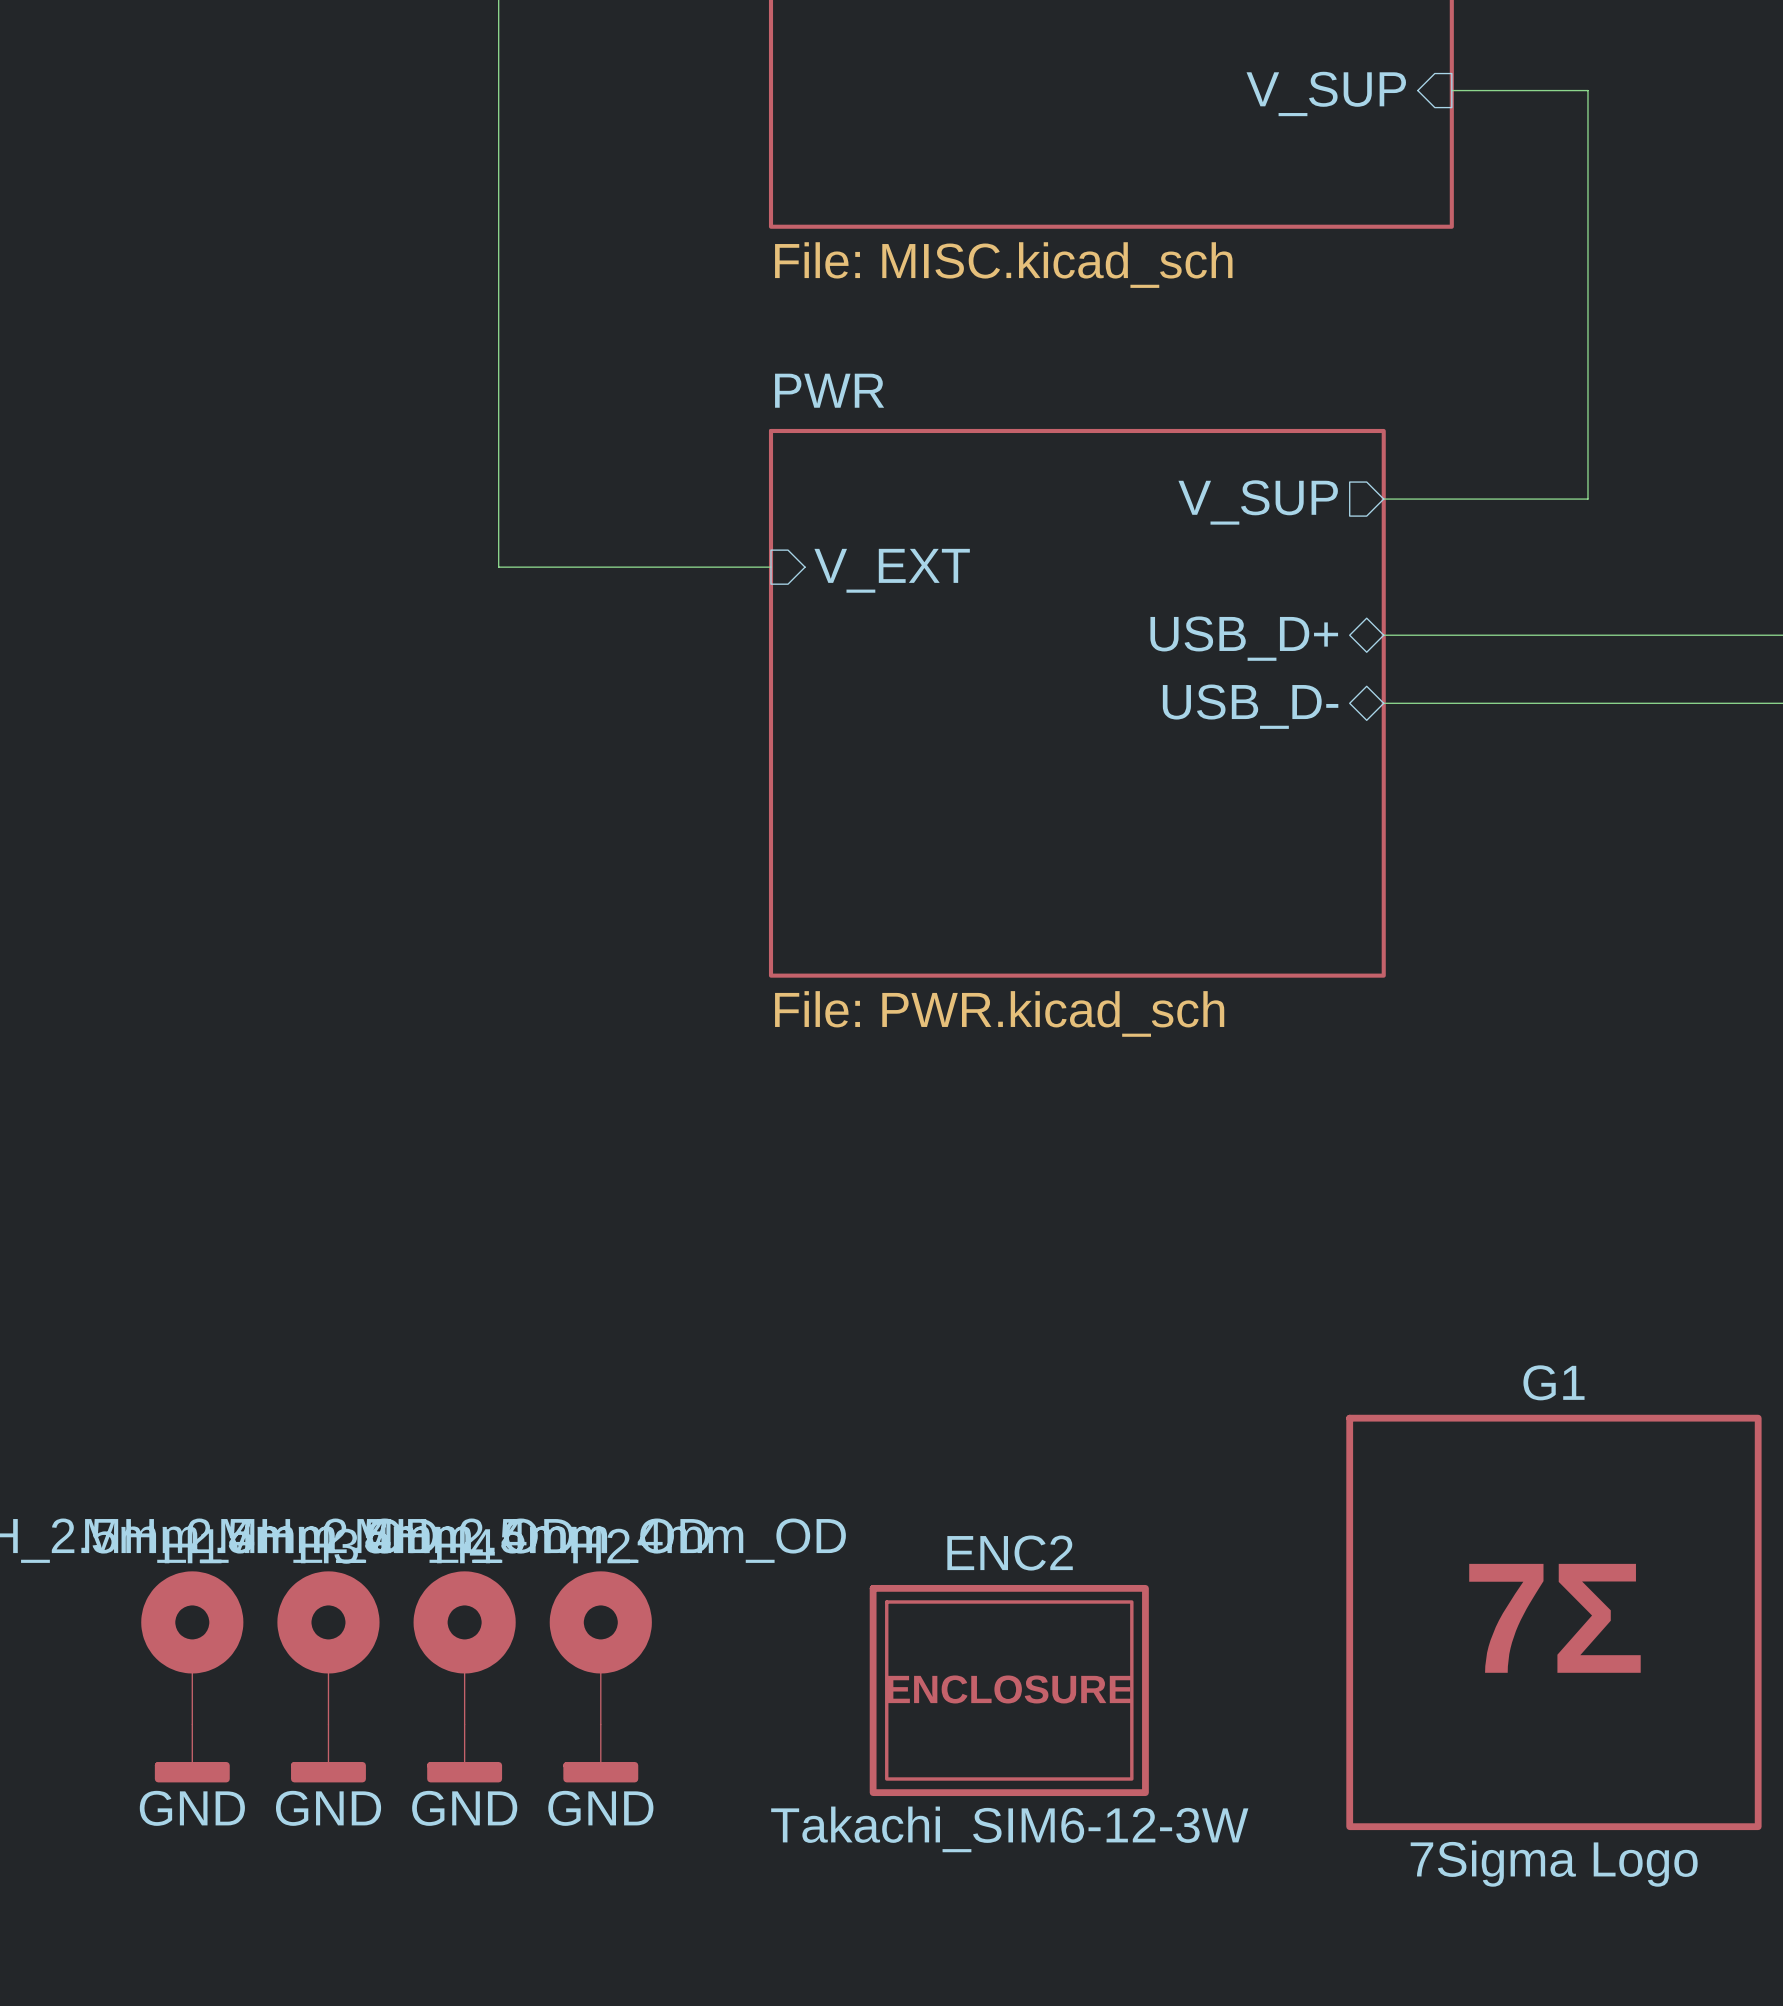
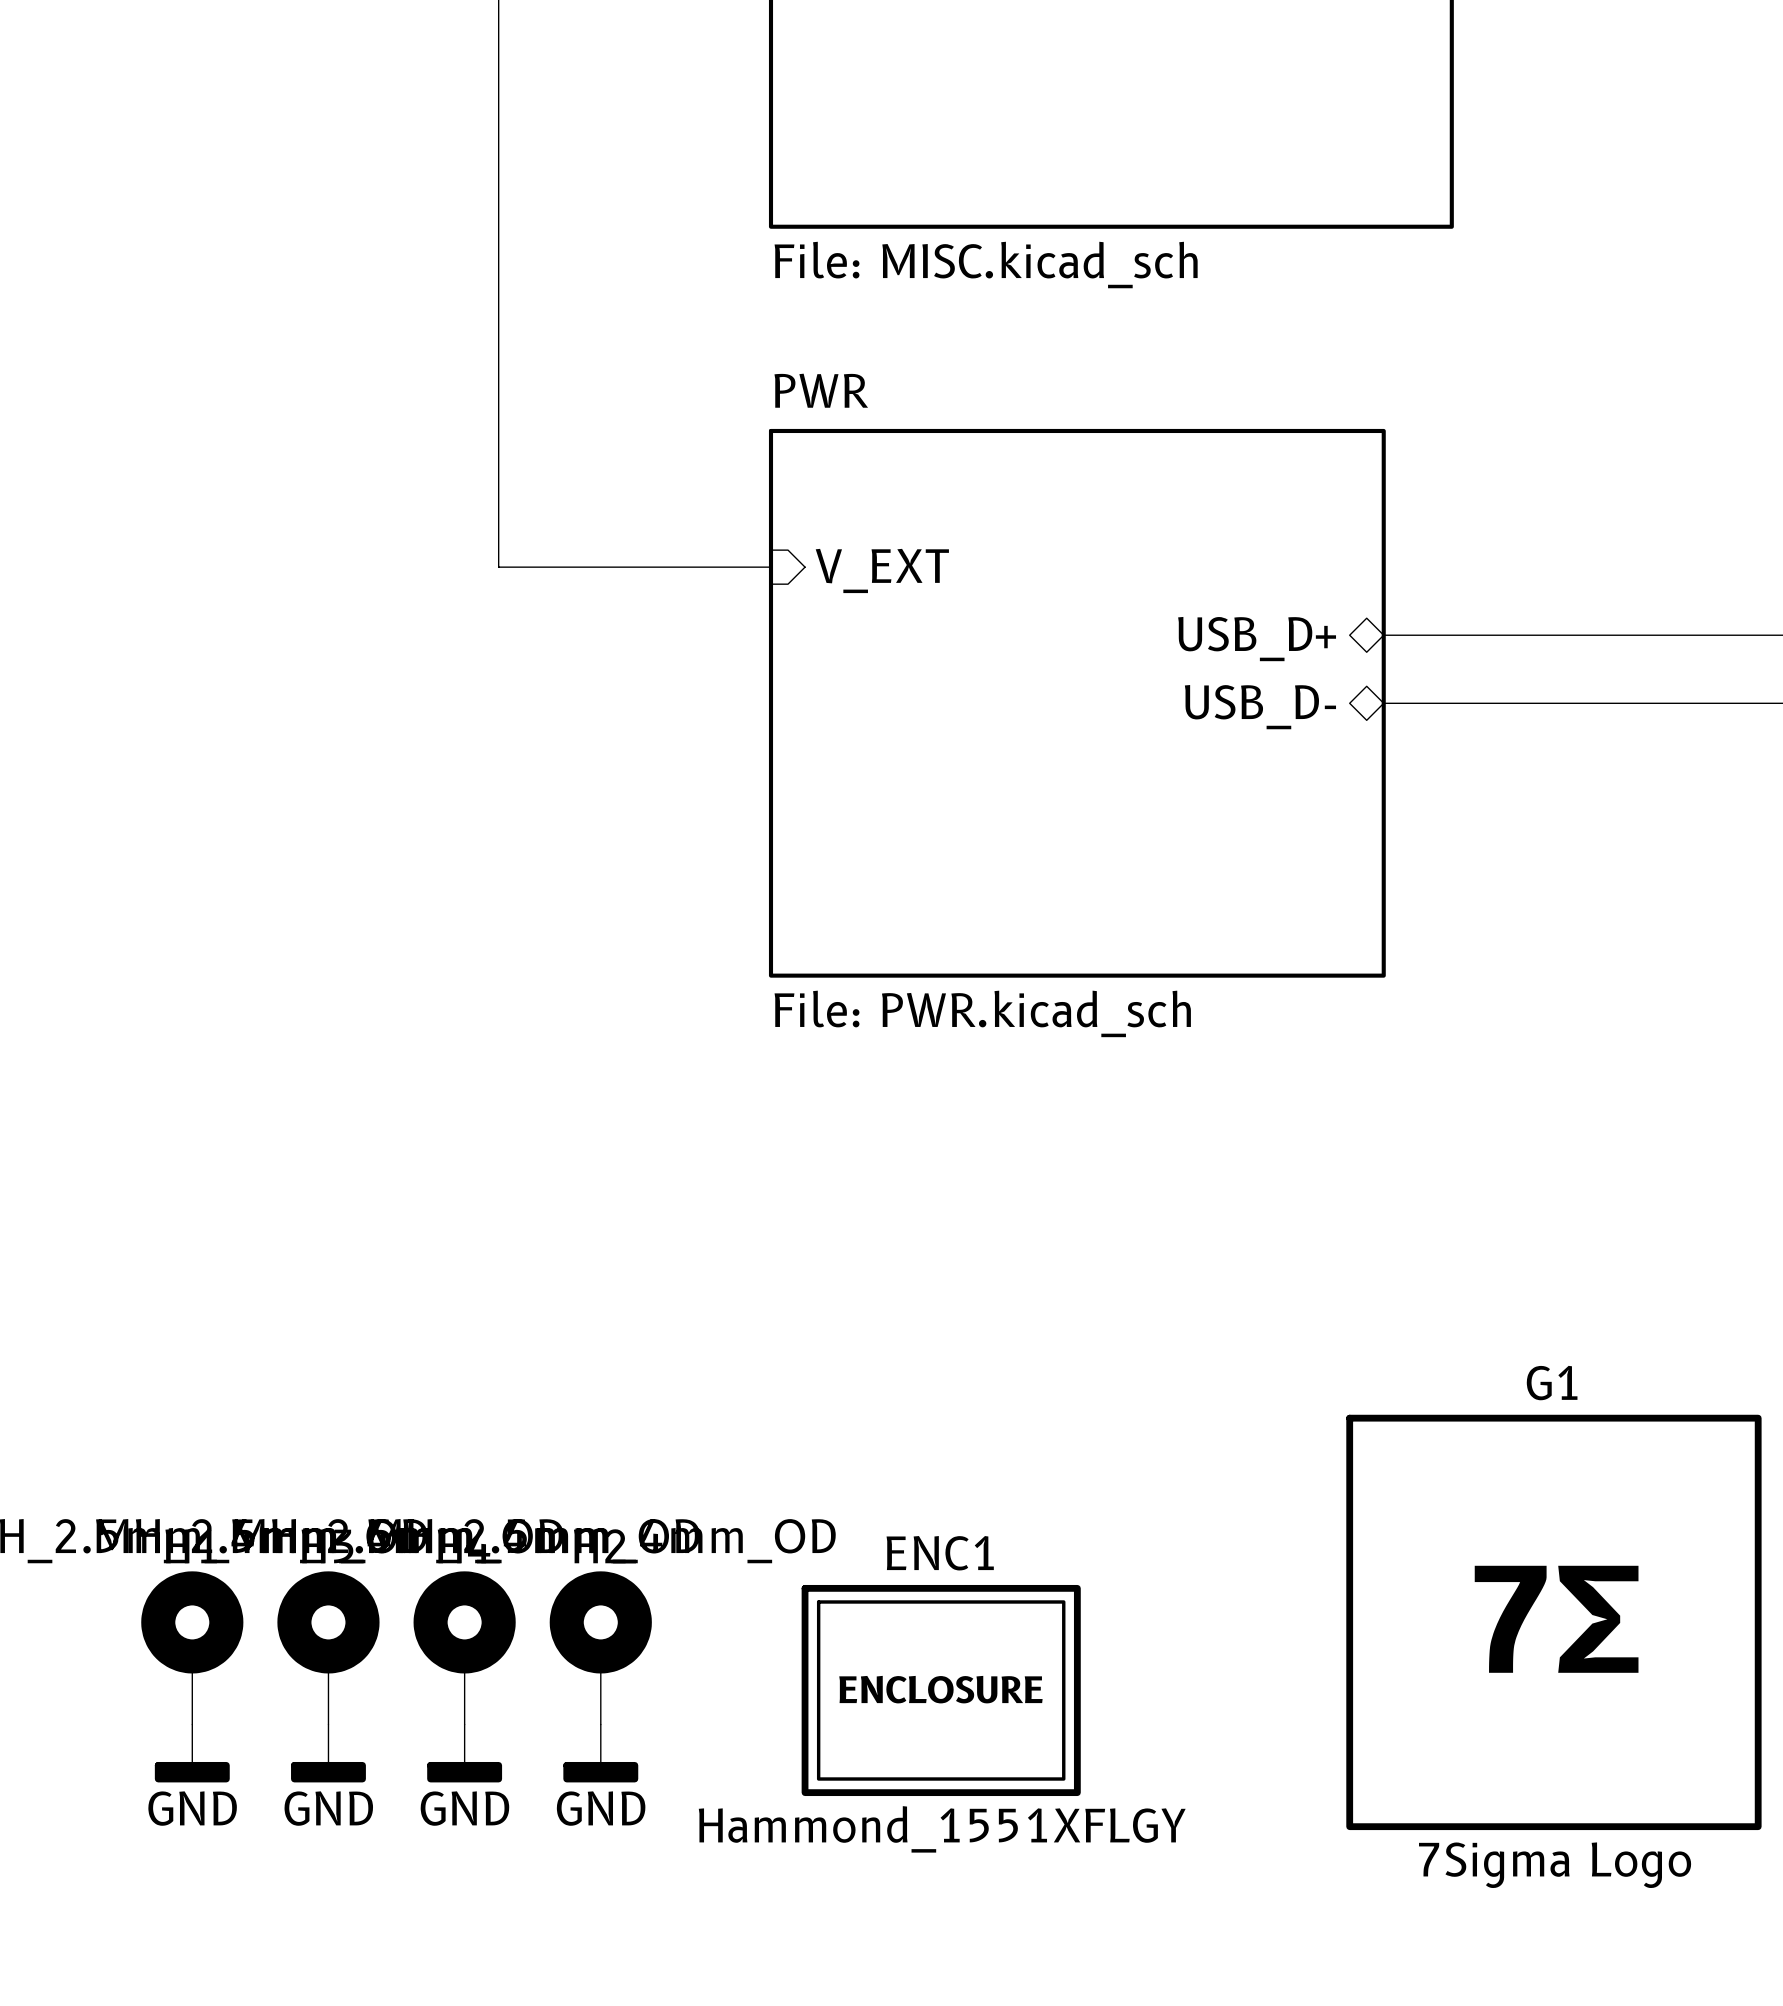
wire: (1451, 90) (1587, 90) (1587, 499) (1383, 499) -> none
sheet pin: V_SUP (1326, 93) -> none
sheet pin: V_SUP (1258, 502) -> none
ENC1: none -> Hammond_1551XFLGY (941, 1690)
ENC2: Takachi_SIM6-12-3W (1009, 1690) -> none

